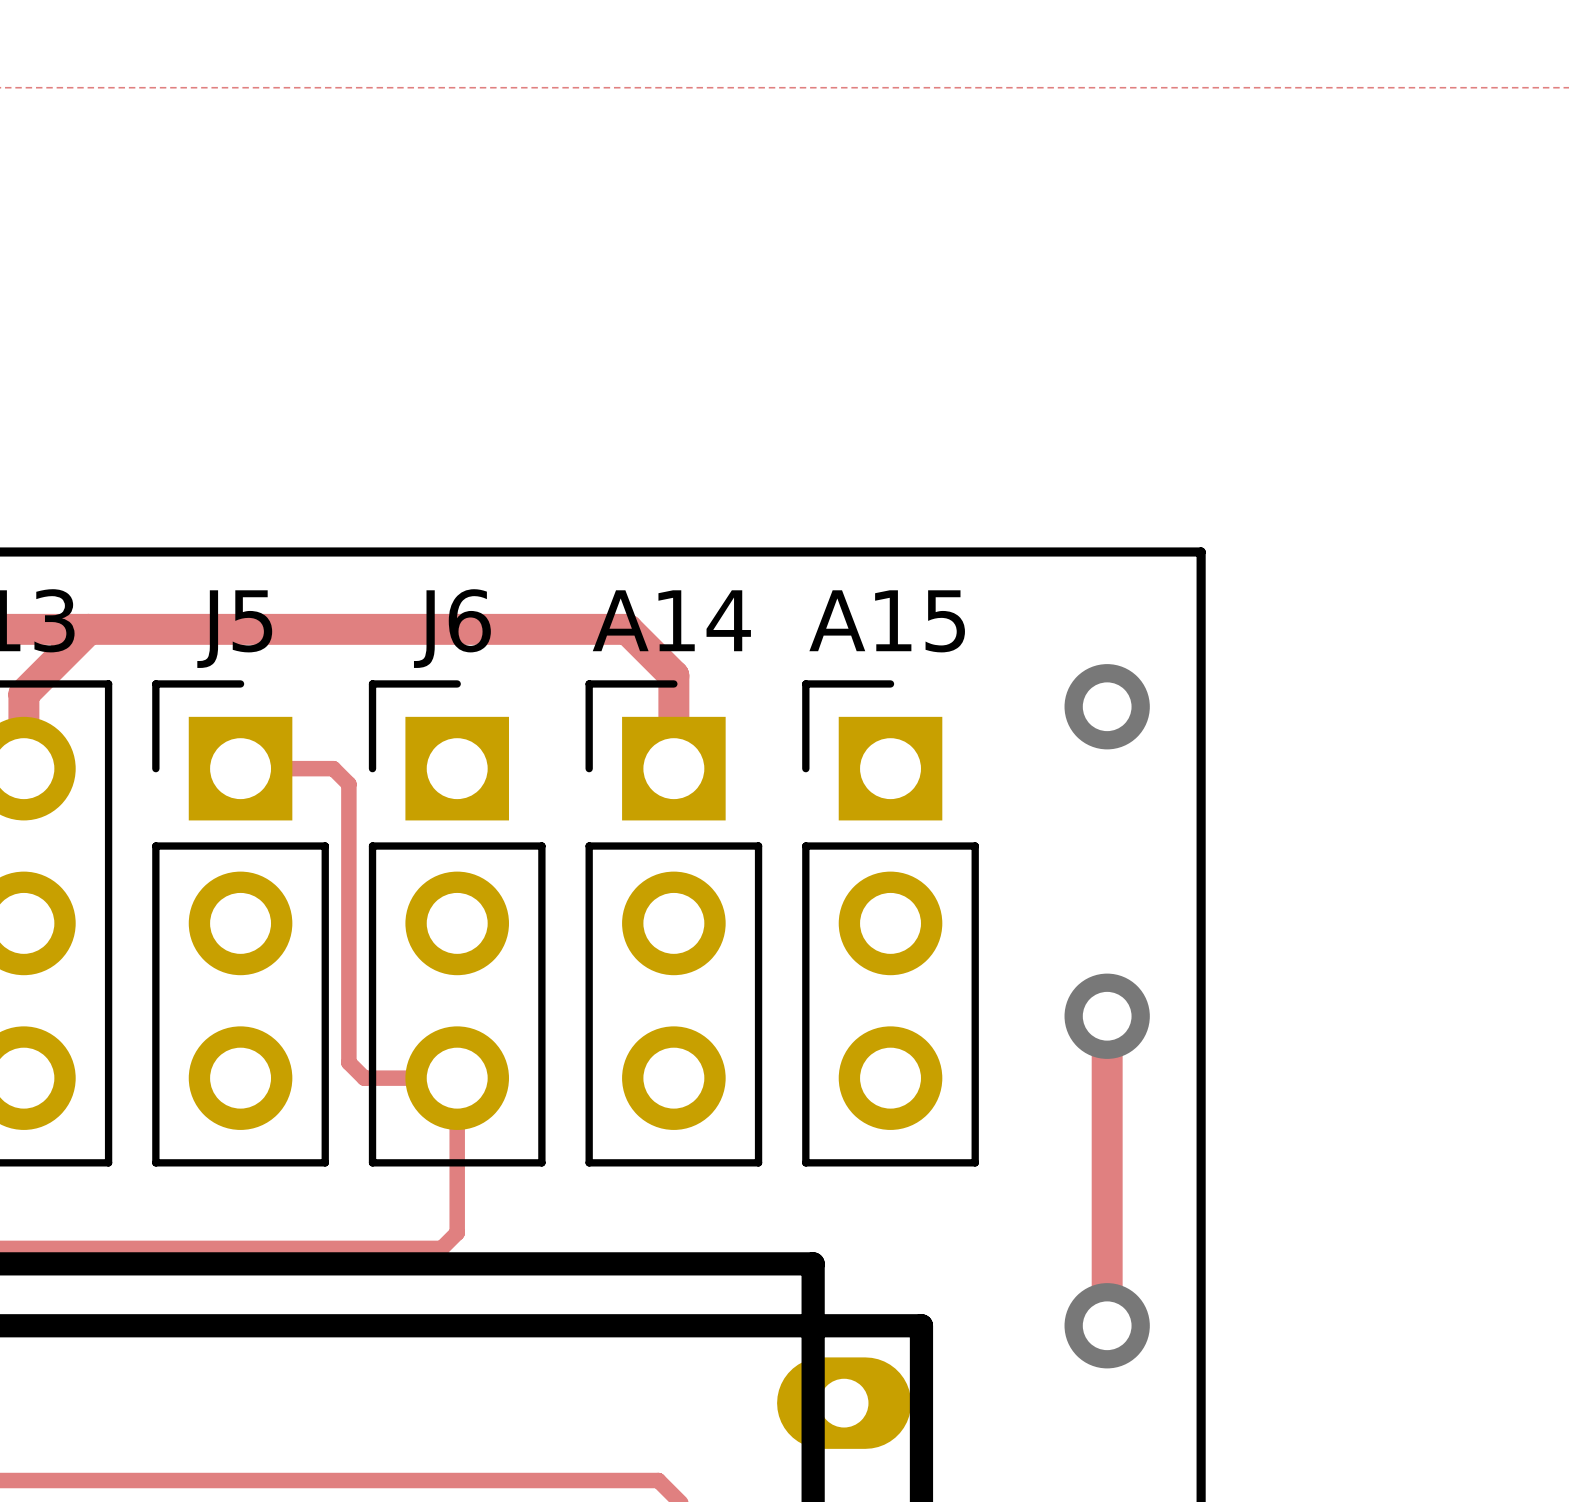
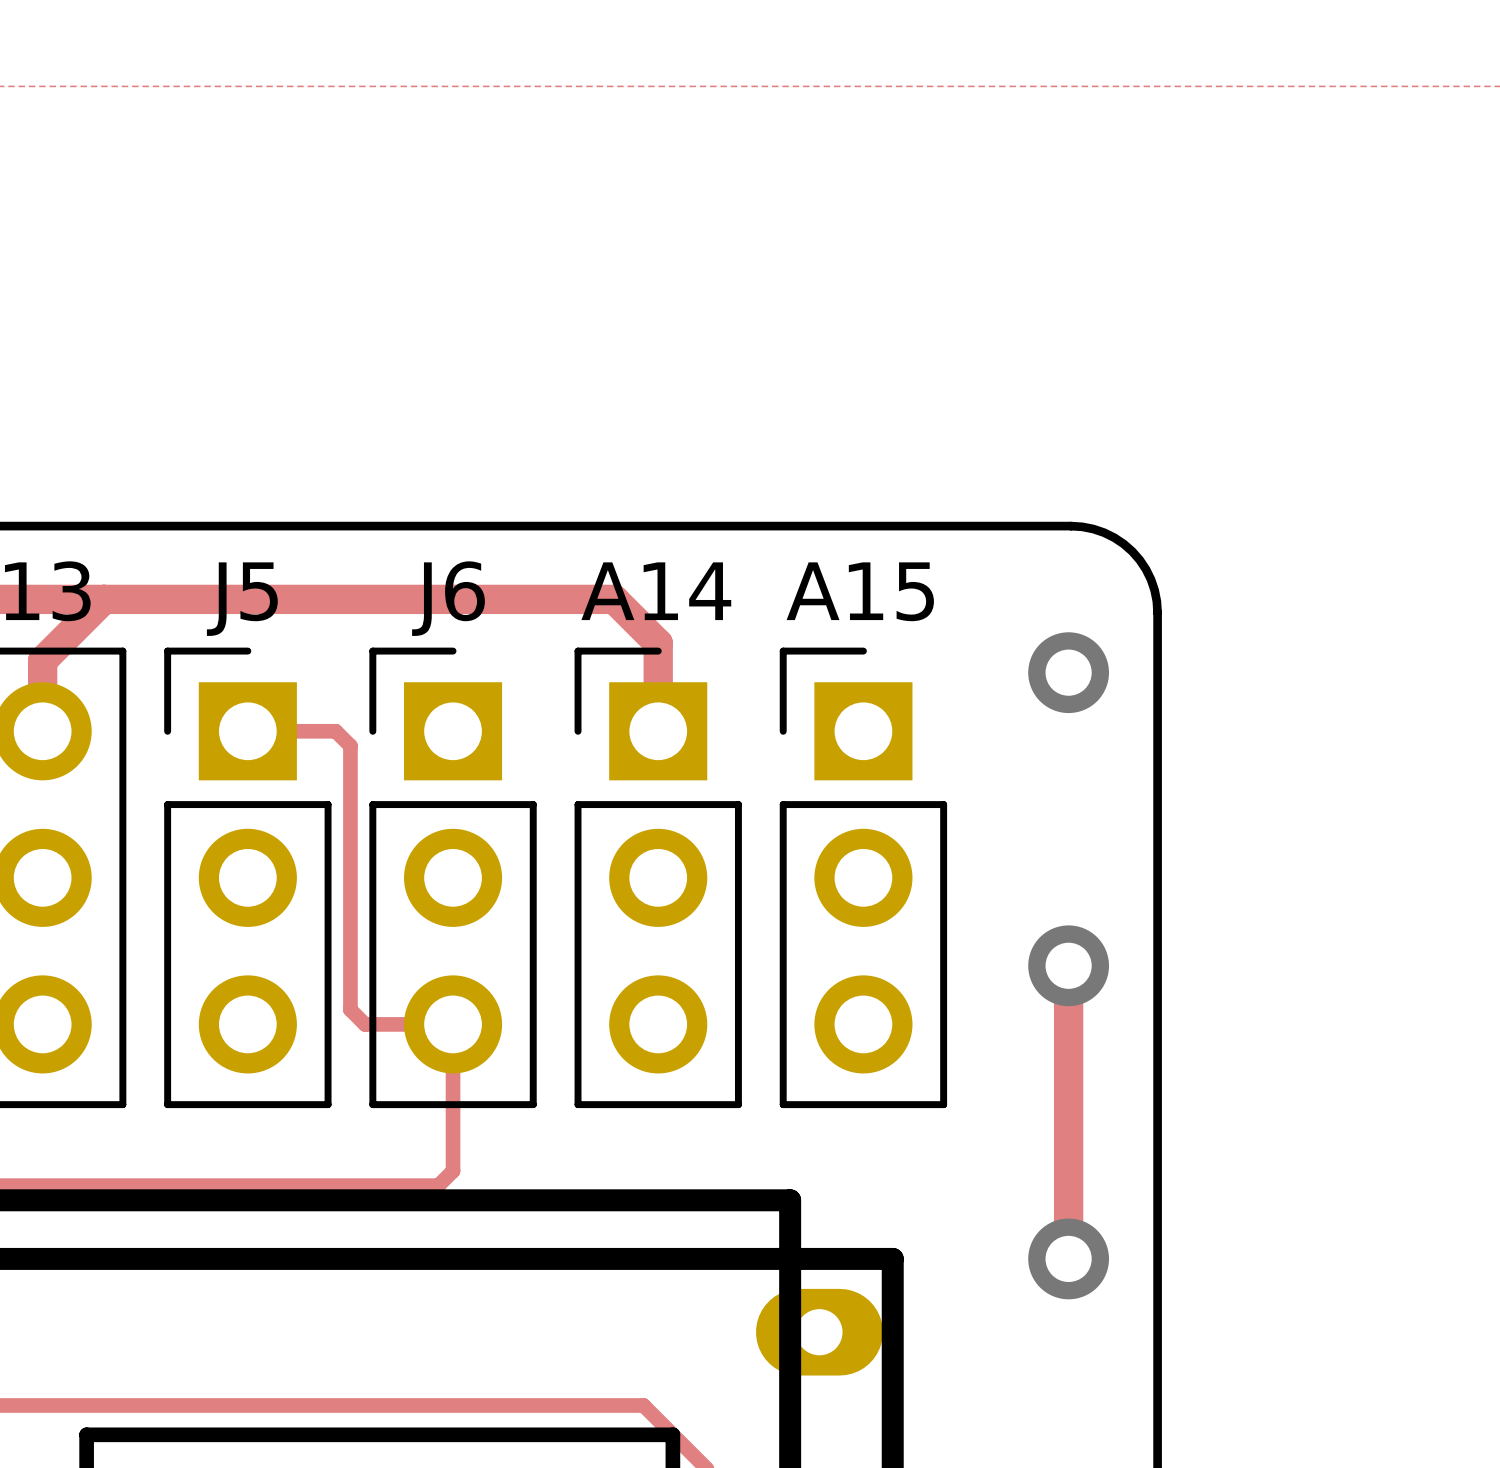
board edge: (1109, 551) (1201, 551) (1201, 643) -> (1071, 526) (1104, 532) (1132, 551) (1151, 579) (1157, 612)

